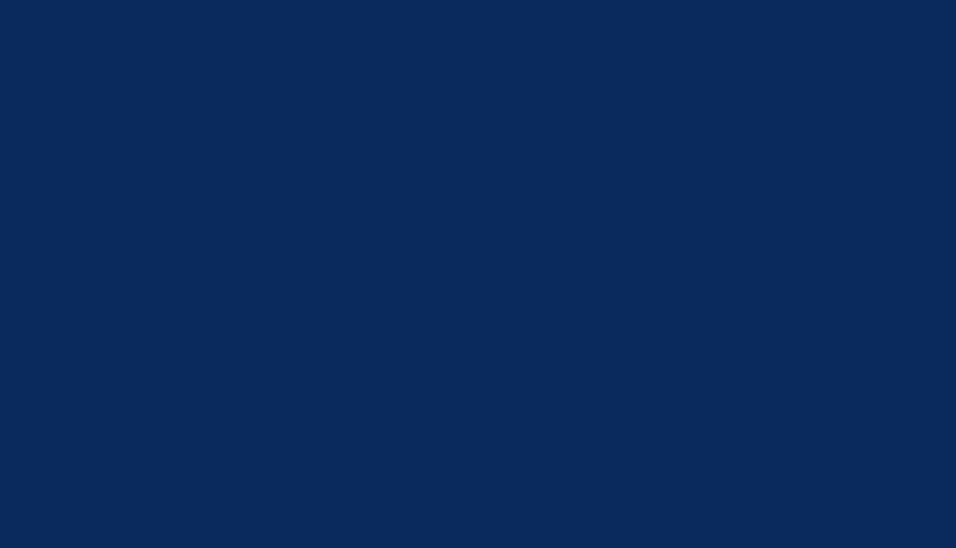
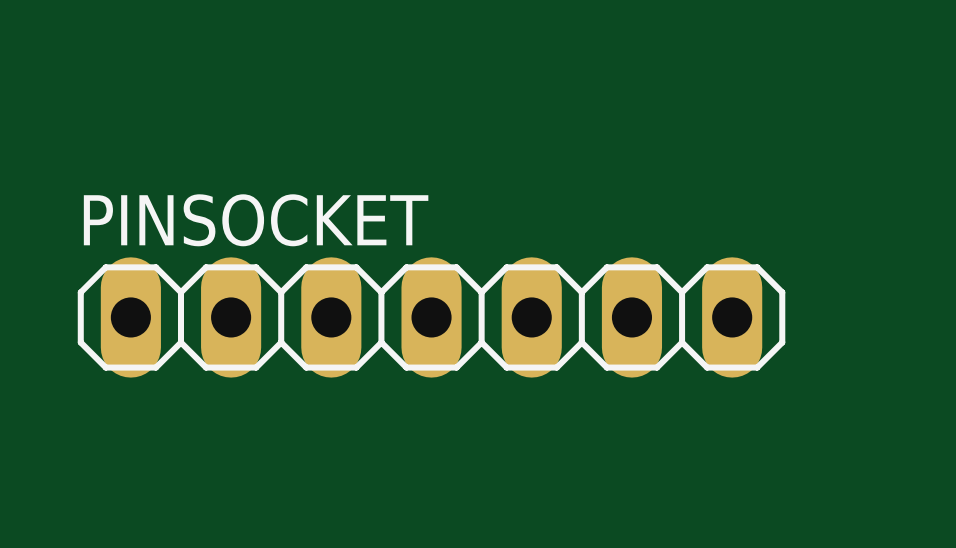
PINSOCKET: none -> (431, 317)

